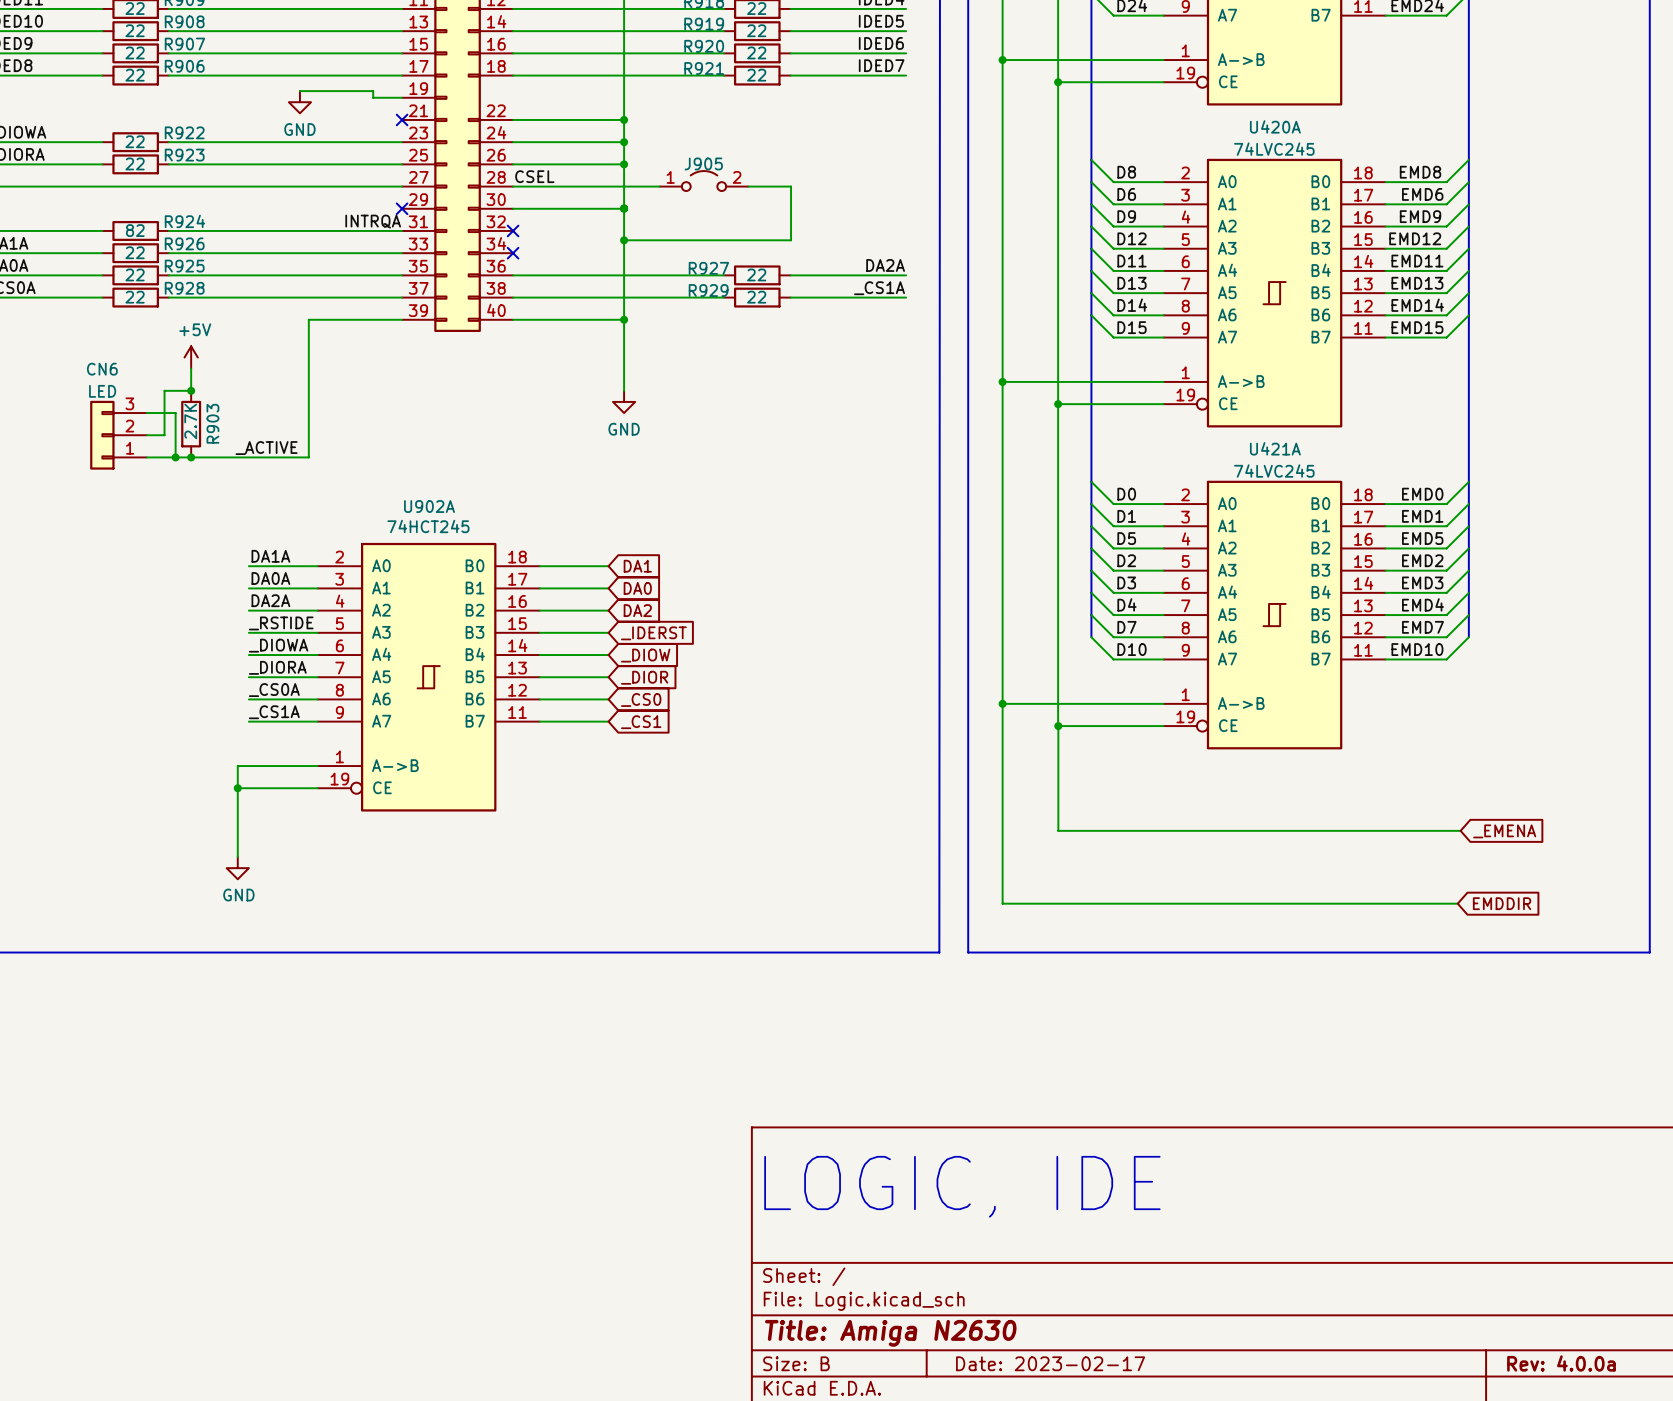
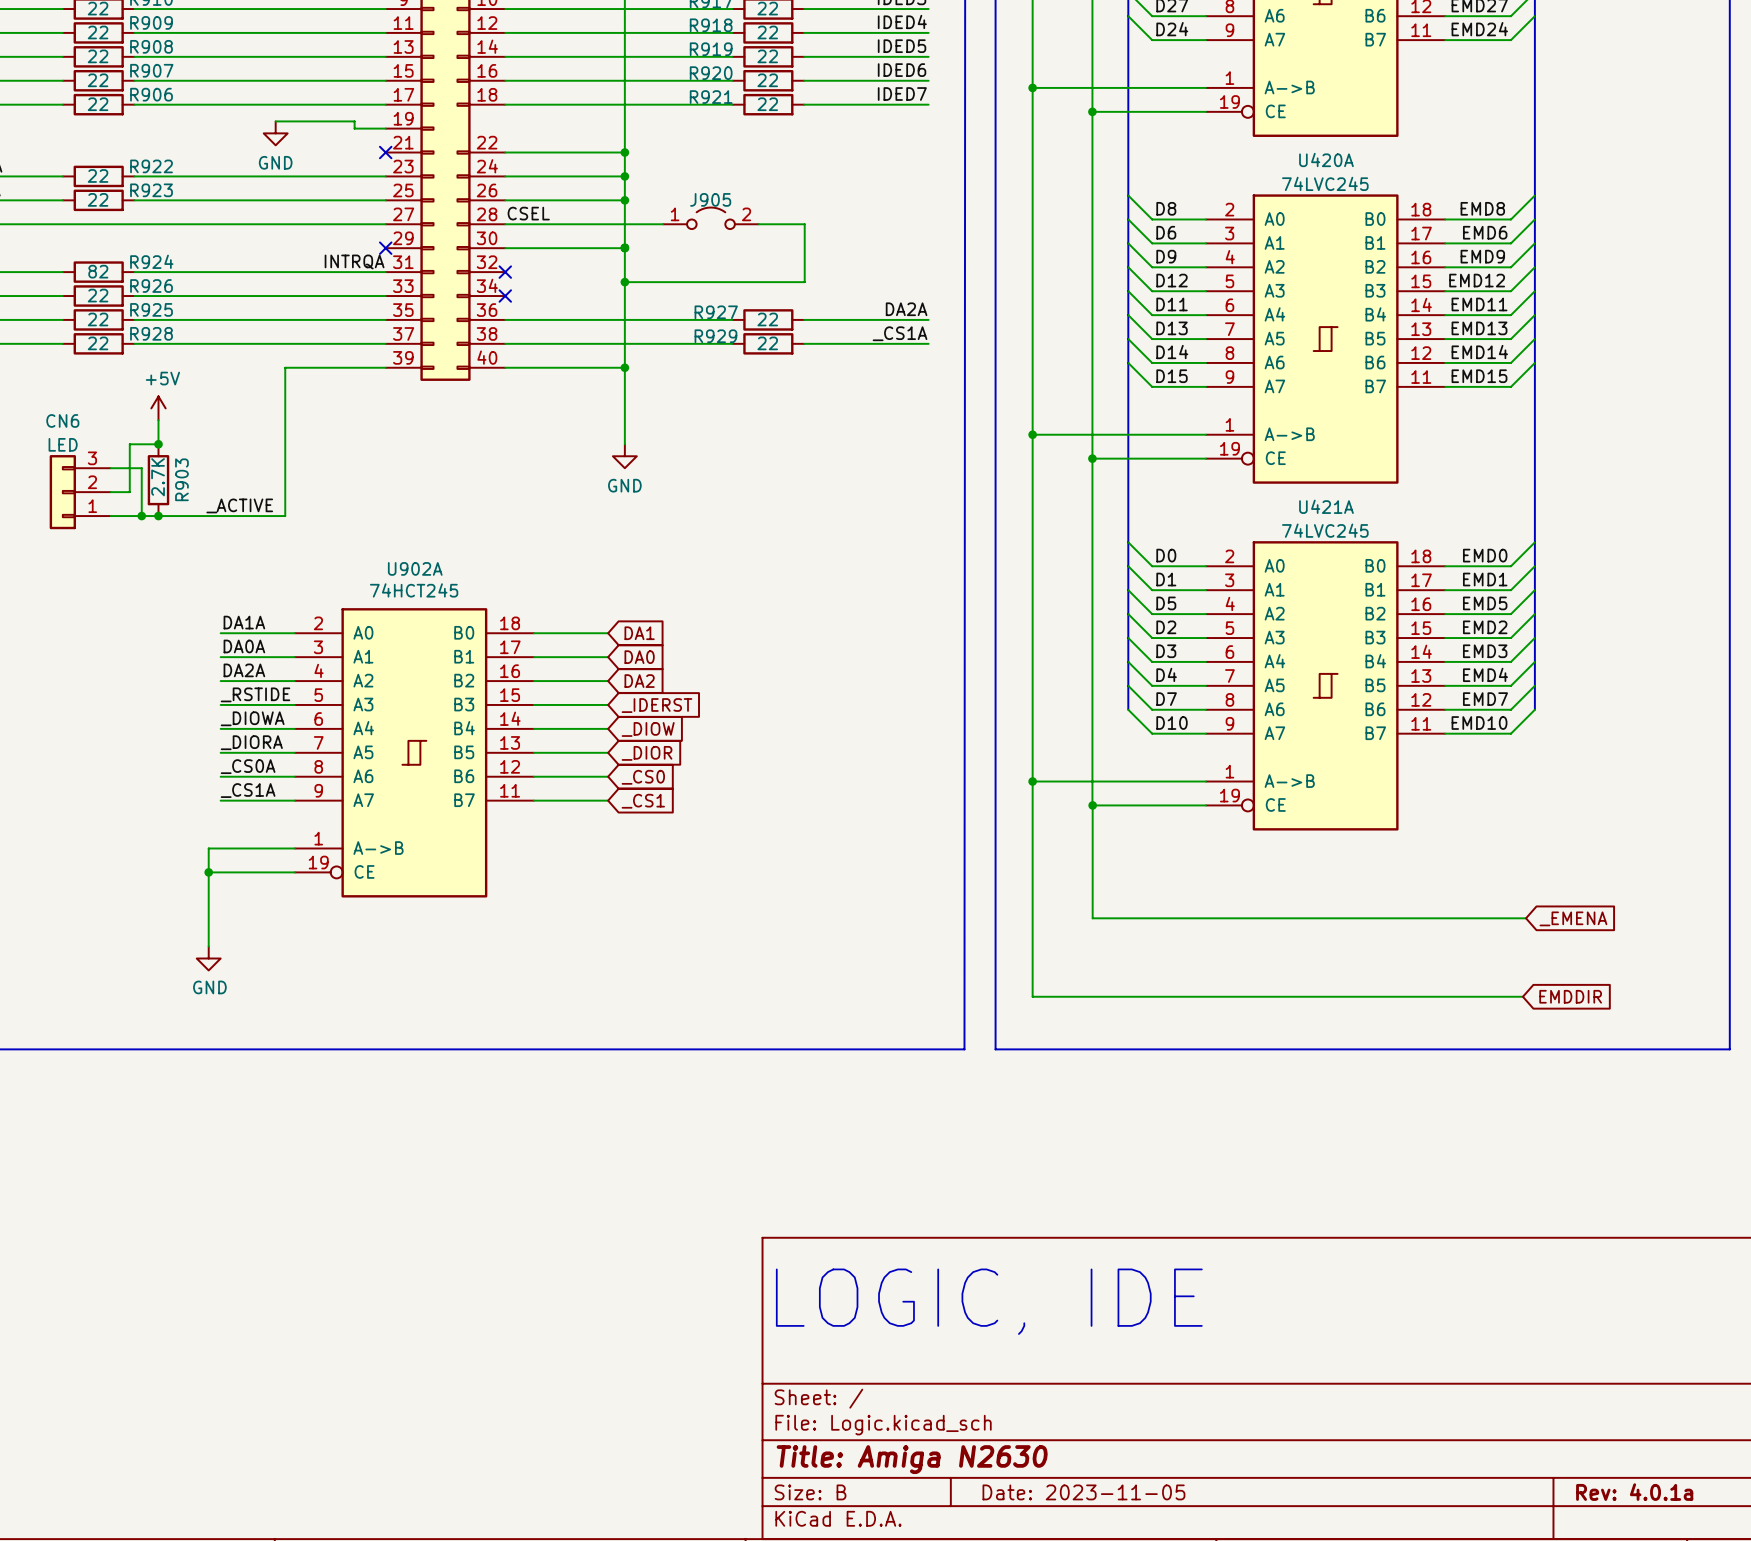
title block: Date: 2023-02-17 (1050, 1363) -> Date: 2023-11-05 (1083, 1492)
title block: Rev: 4.0.0a (1561, 1363) -> Rev: 4.0.1a (1634, 1492)

